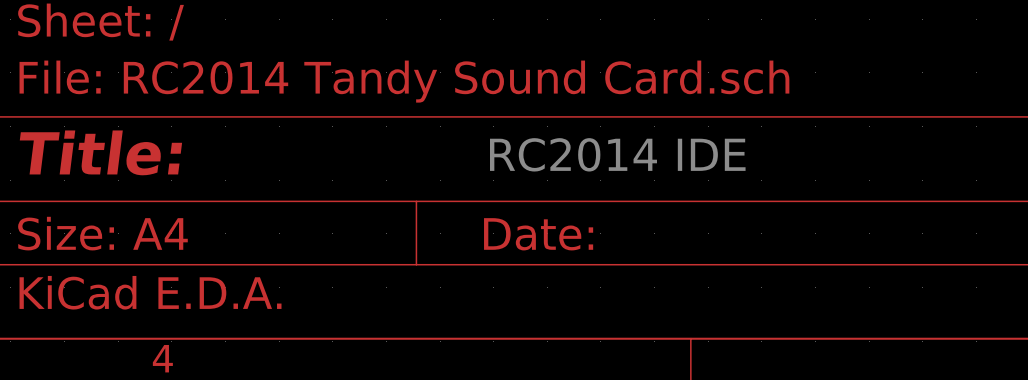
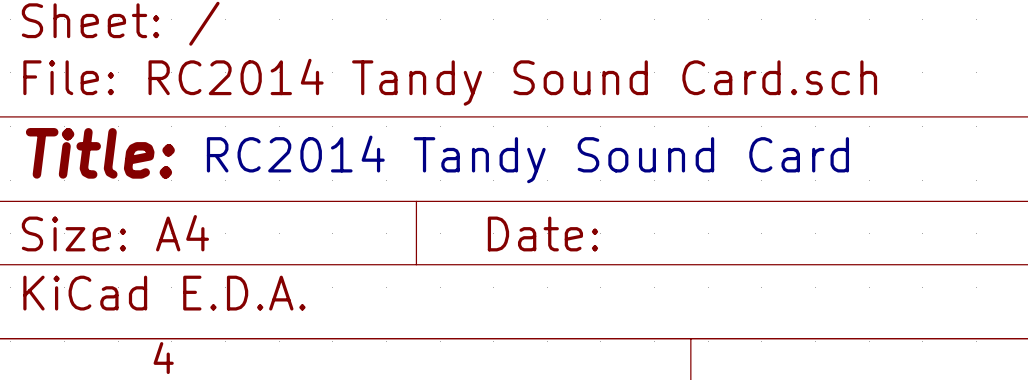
text: RC2014 IDE (617, 154) -> none
text: none -> RC2014 Tandy Sound Card (527, 159)

